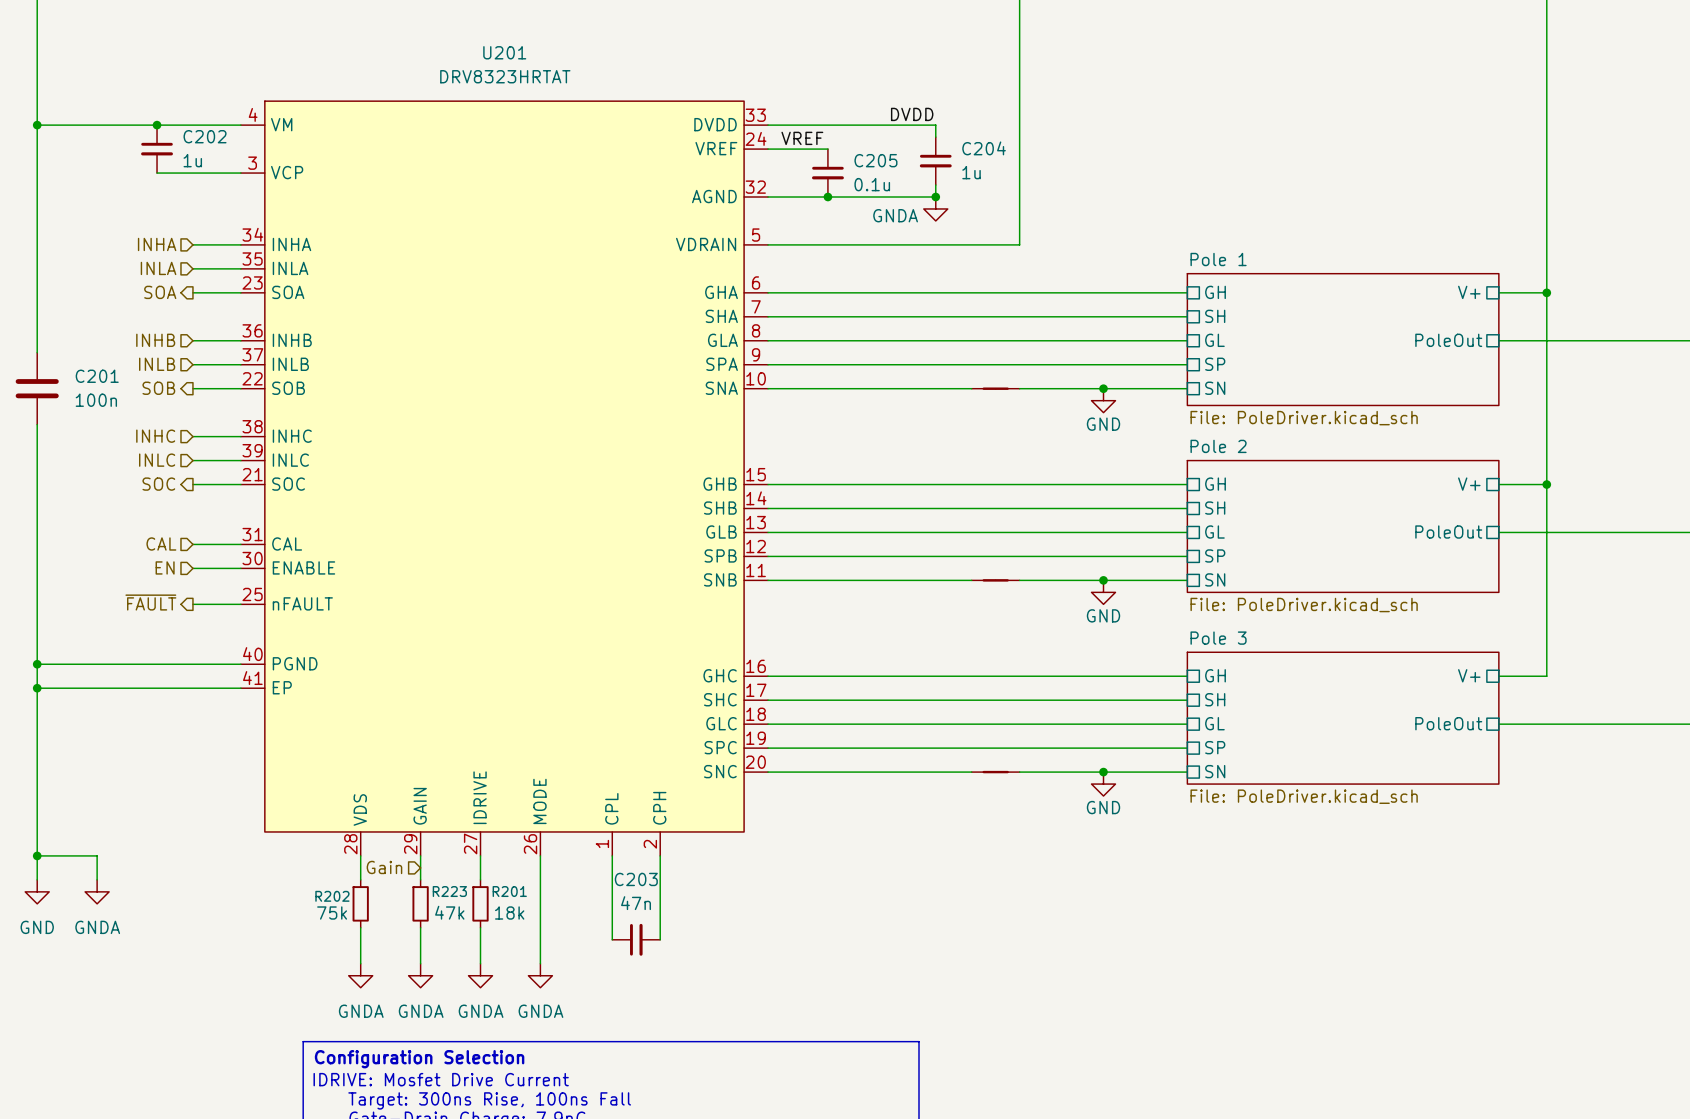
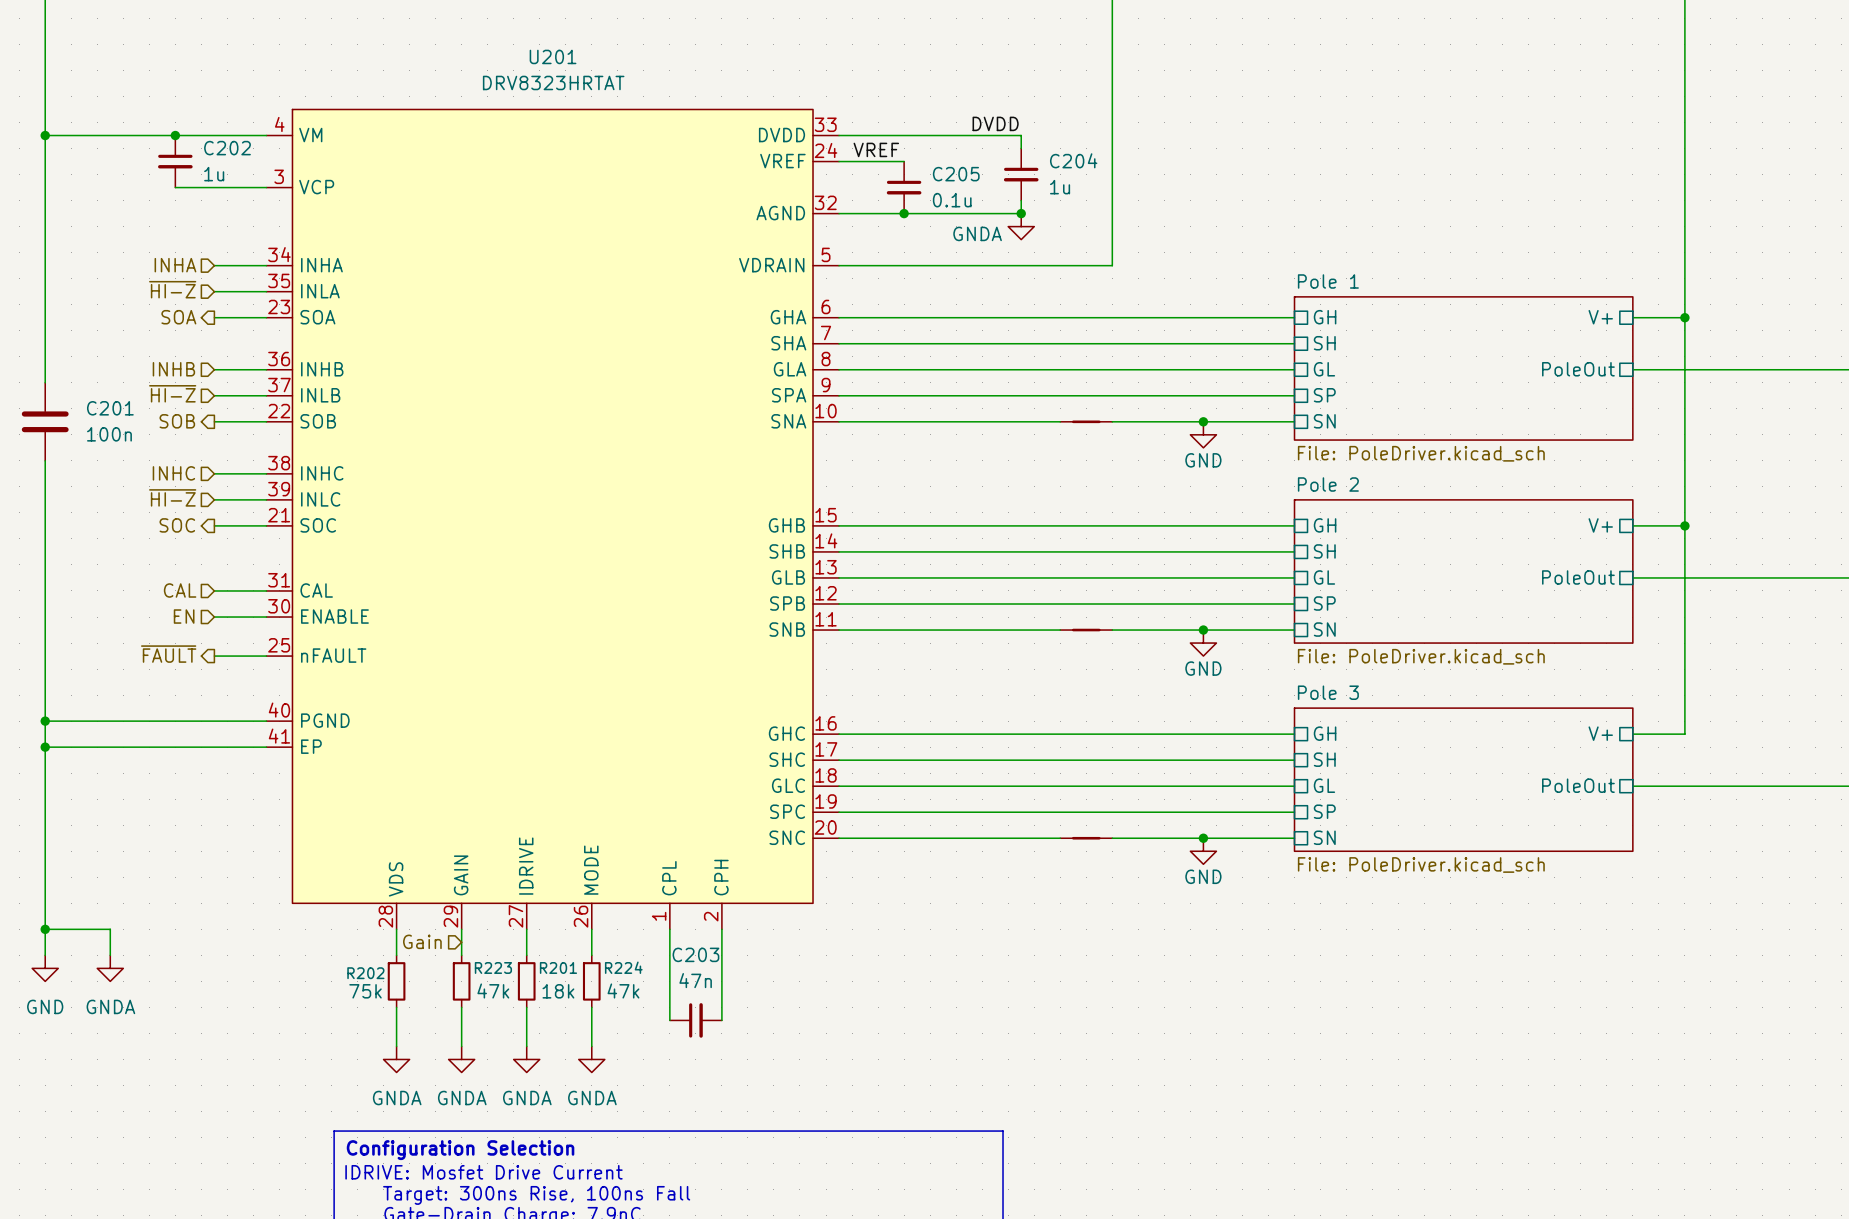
hierarchical label: INLA (158, 268) -> ~{HI-Z} (172, 289)
hierarchical label: INLB (157, 364) -> ~{HI-Z} (172, 393)
hierarchical label: INLC (157, 460) -> ~{HI-Z} (172, 497)
wire: (540, 879) (540, 927) -> none
R224: none -> 47k (591, 981)

